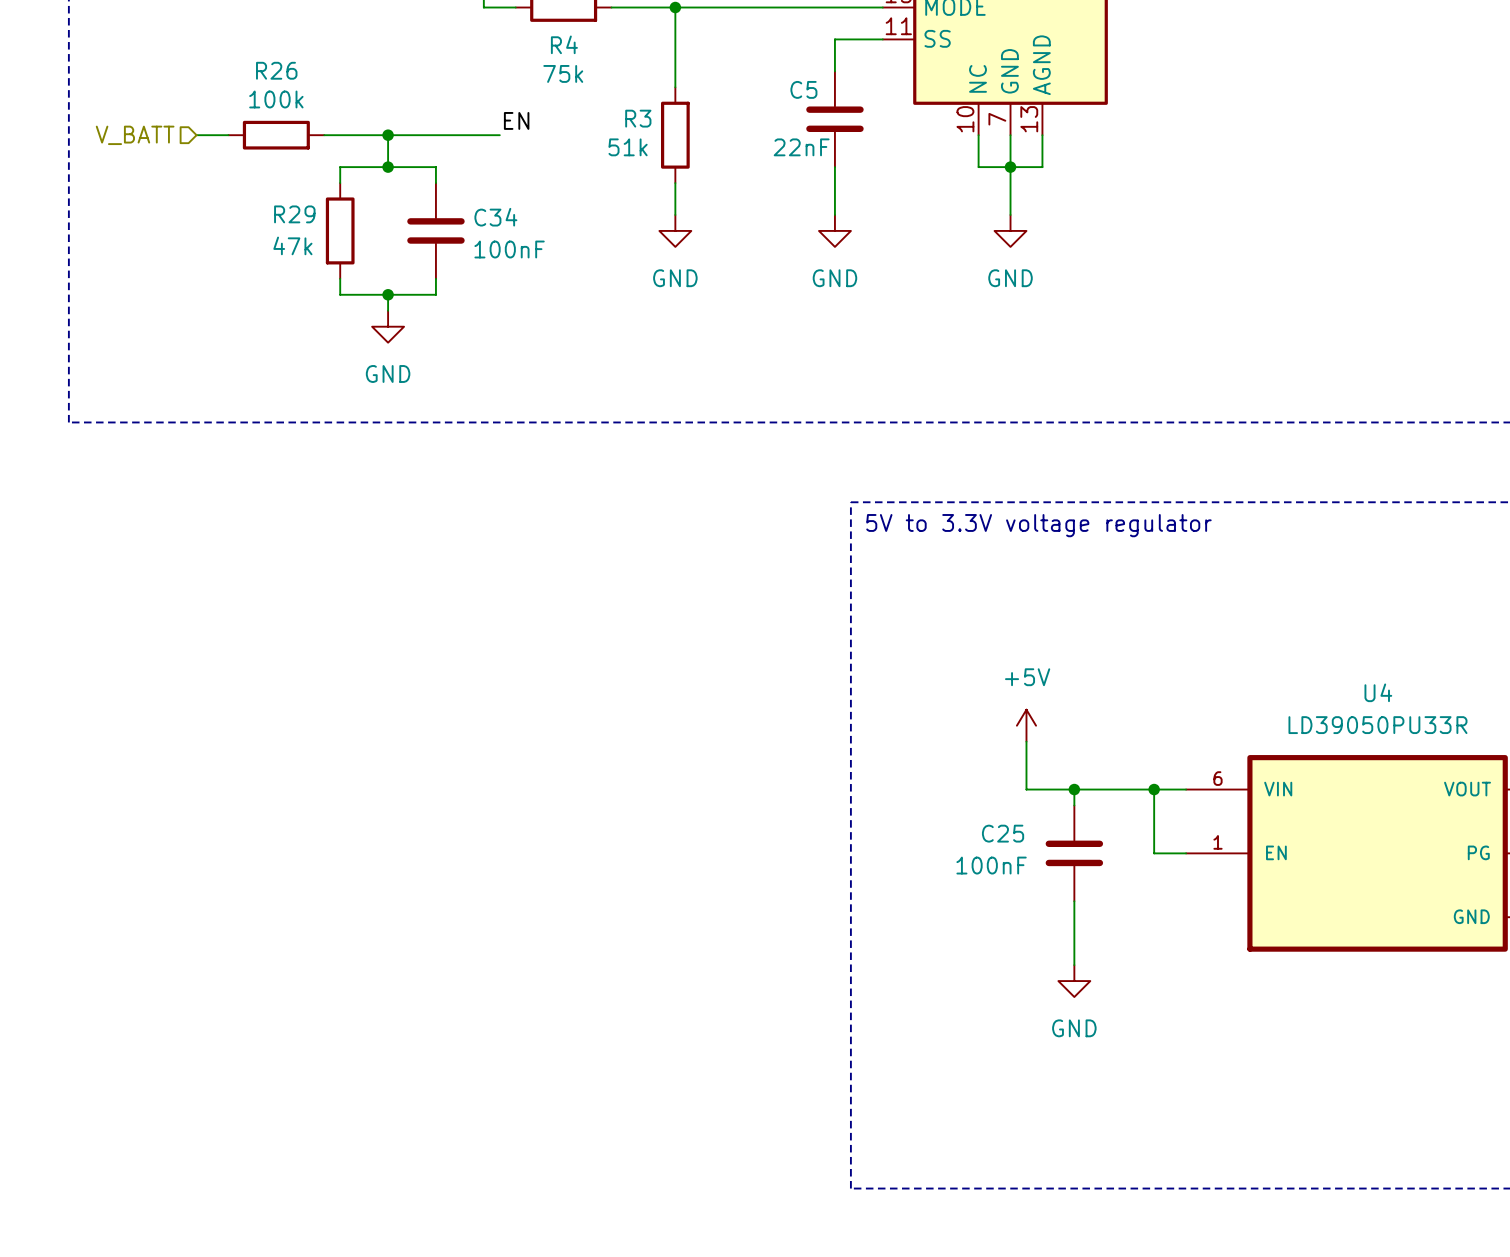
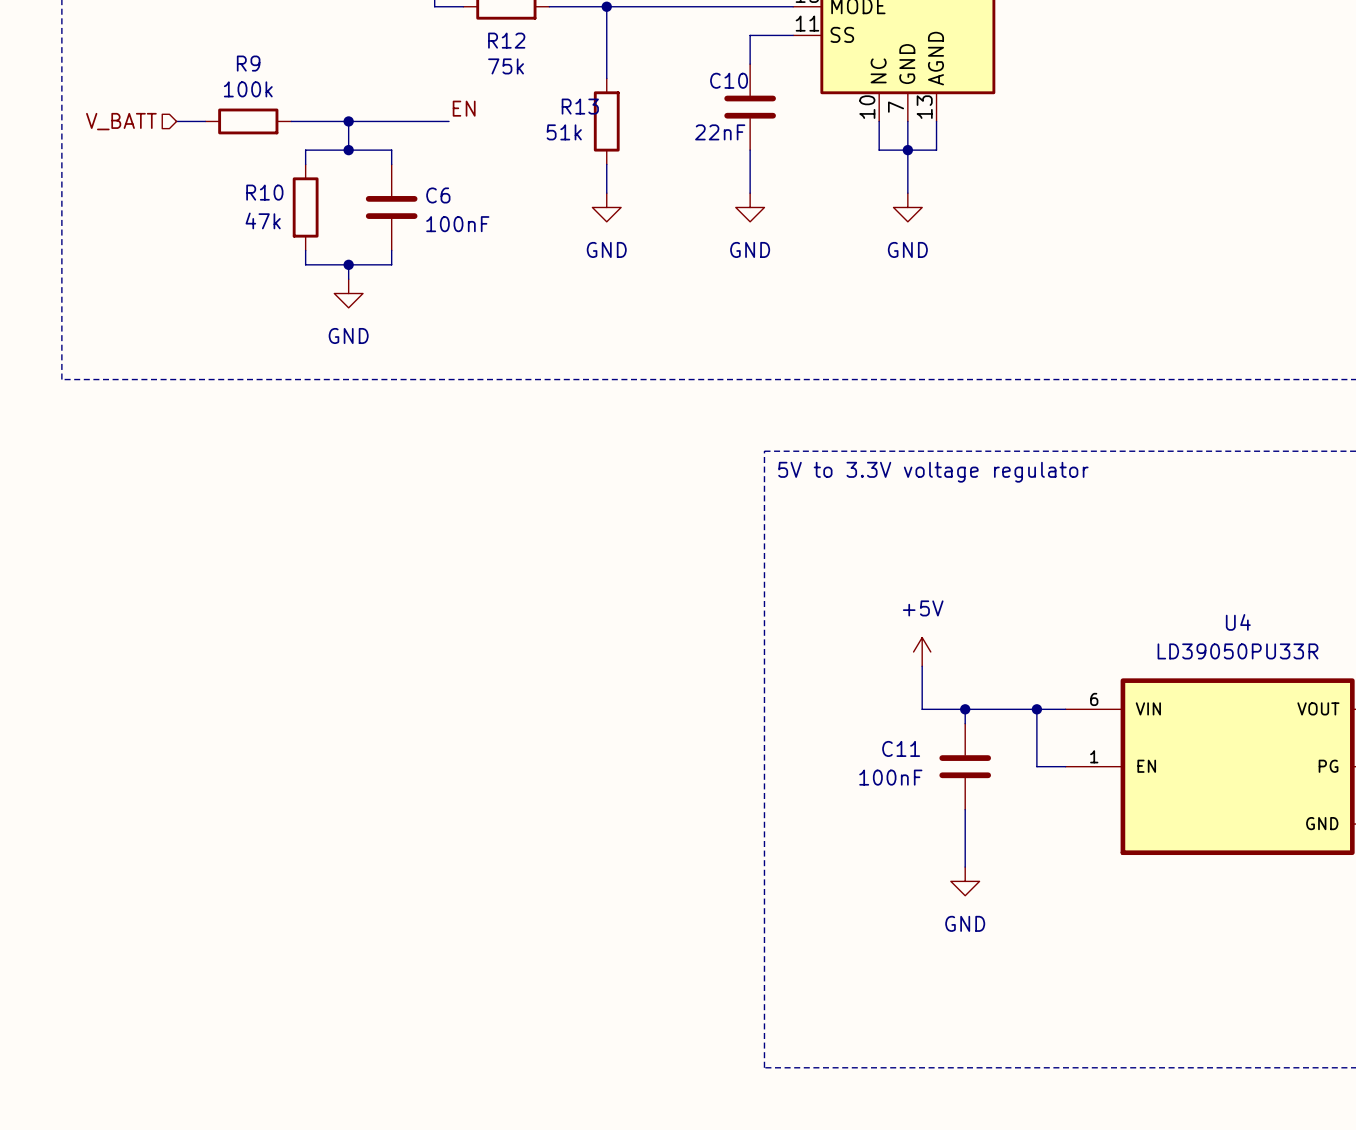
R4 name: R4 (564, 44) -> R12 (506, 40)
R26 name: R26 (276, 70) -> R9 (248, 63)
C5 name: C5 (803, 89) -> C10 (729, 80)
R3 name: R3 (638, 118) -> R13 (580, 106)
R29 name: R29 (294, 214) -> R10 (264, 192)
C34 name: C34 (495, 217) -> C6 (438, 195)
C25 name: C25 (1003, 833) -> C11 (901, 748)

